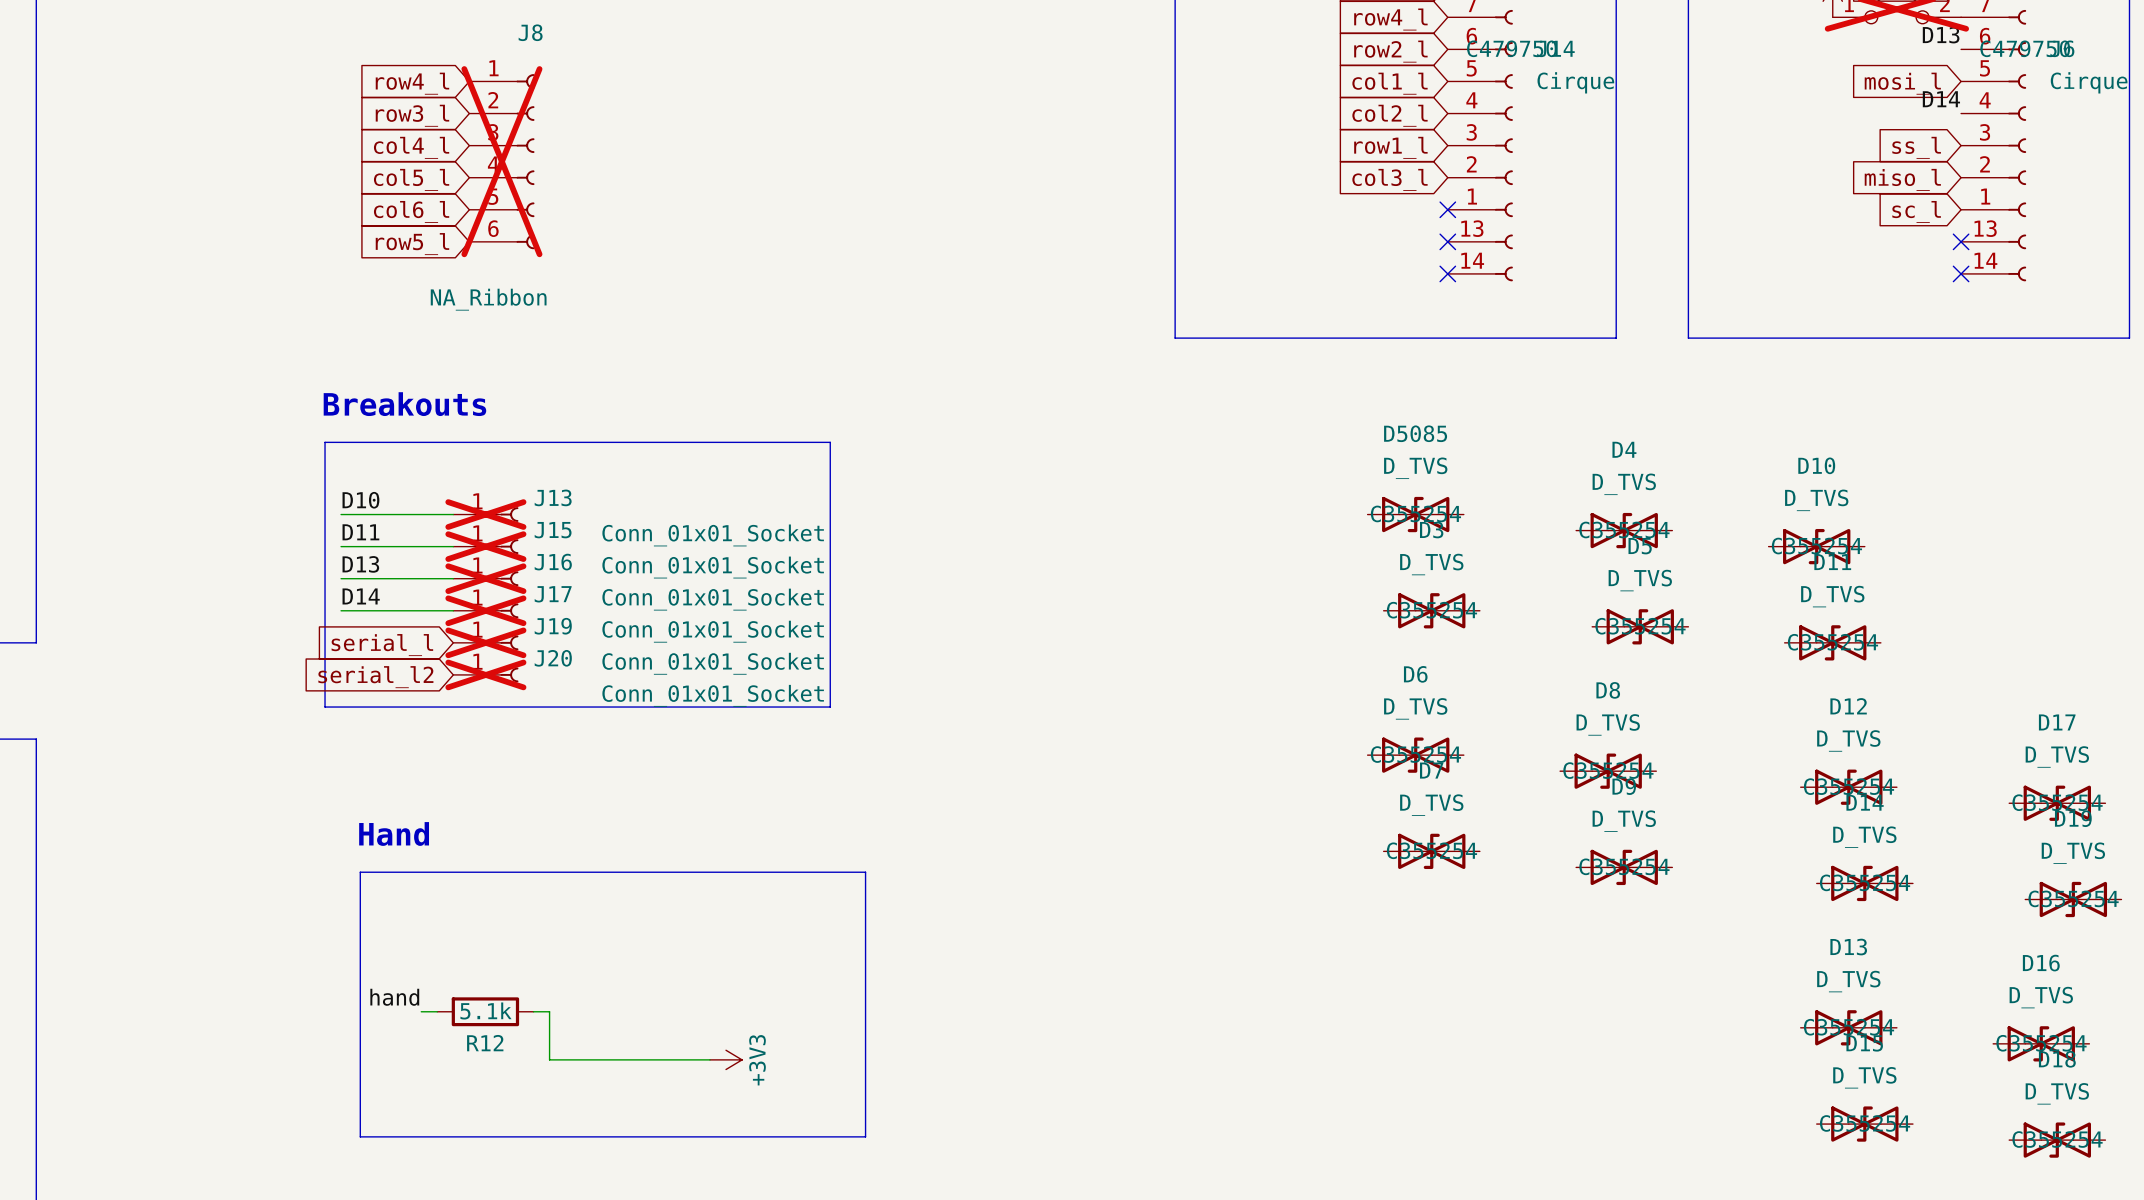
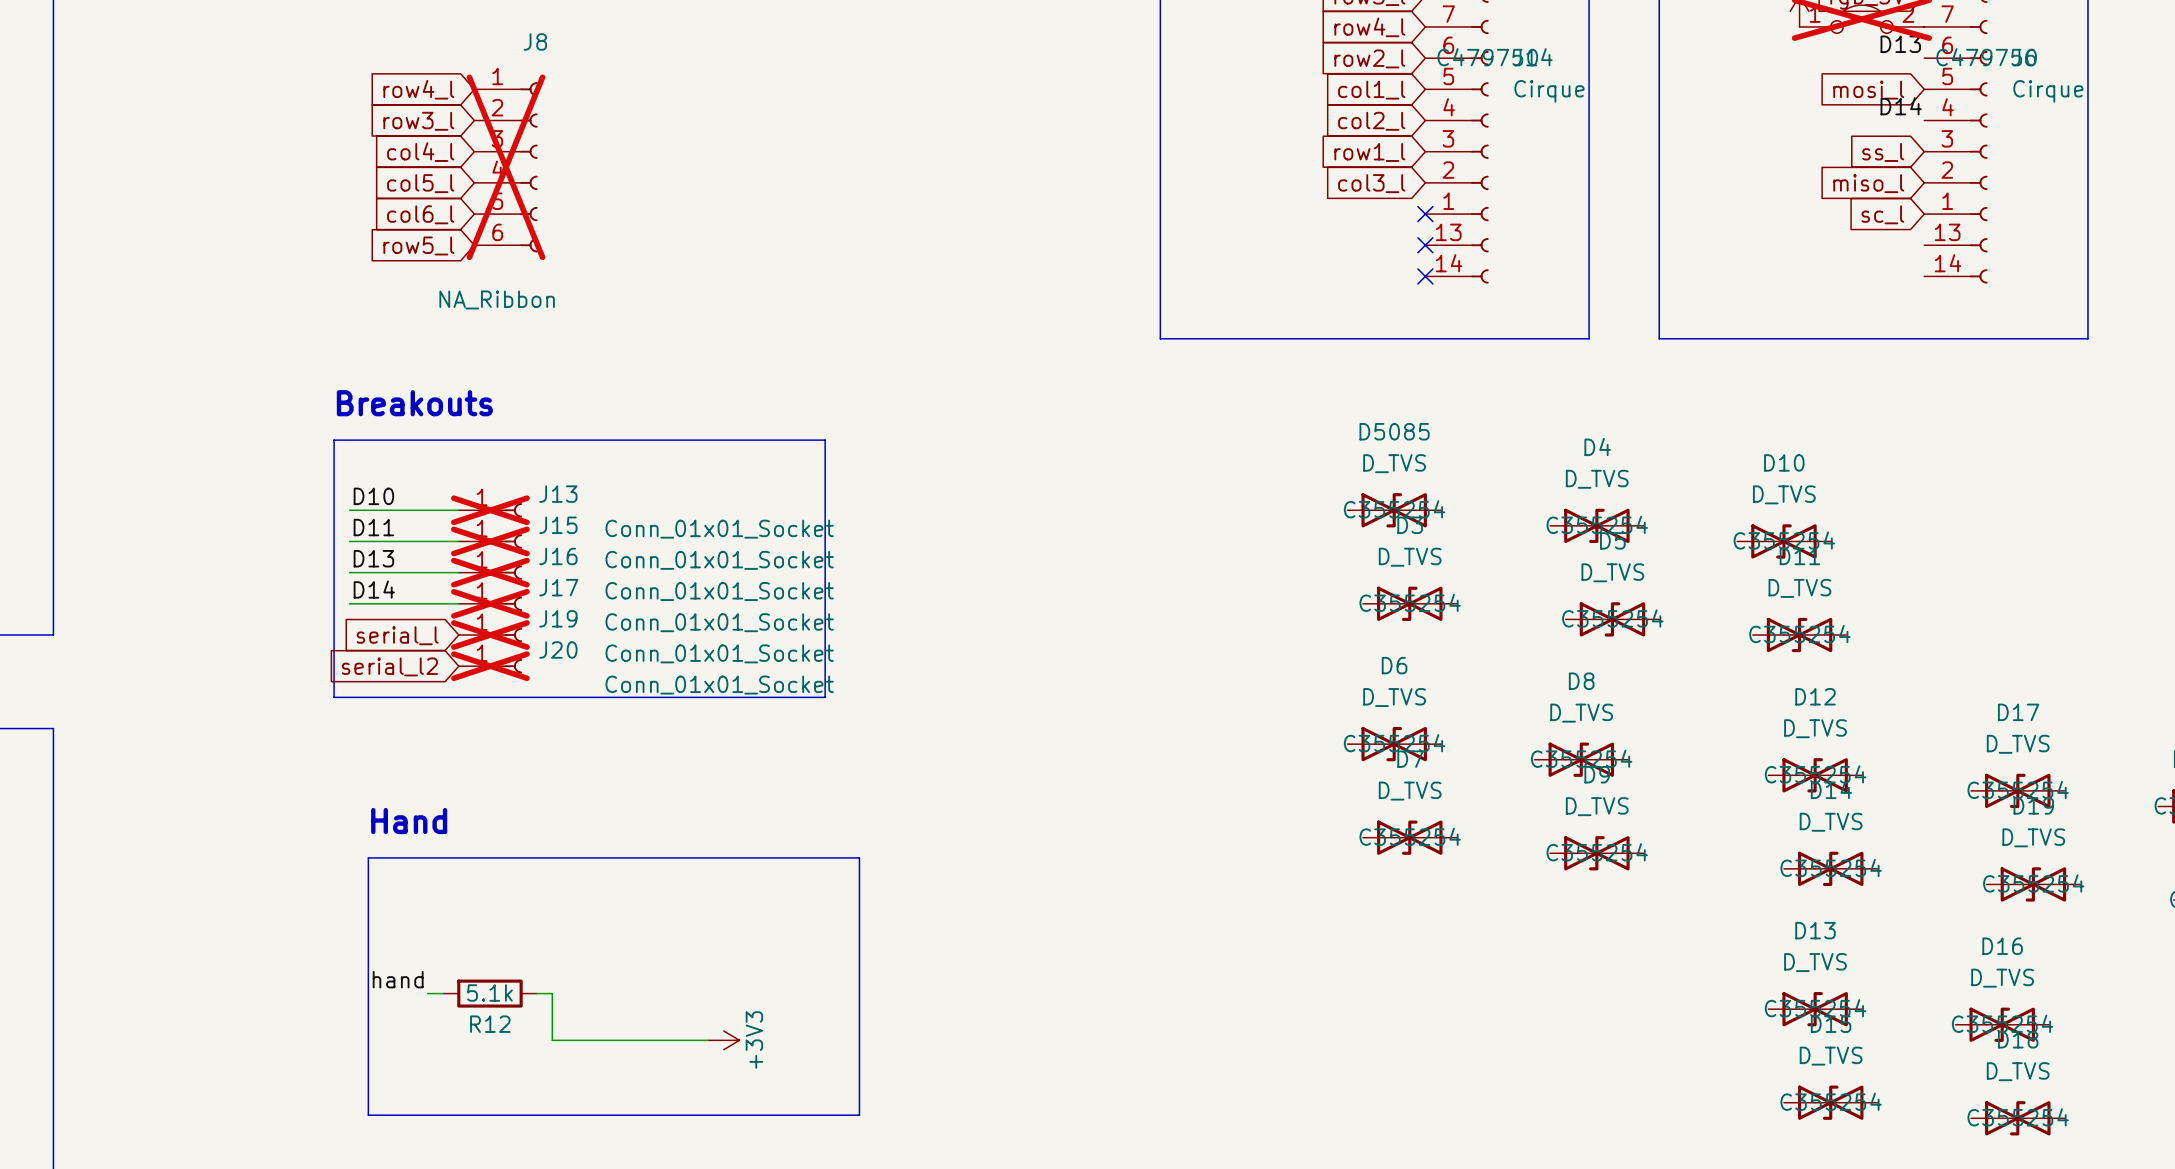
no-connect mark: (1961, 241) -> none
no-connect mark: (1961, 273) -> none

